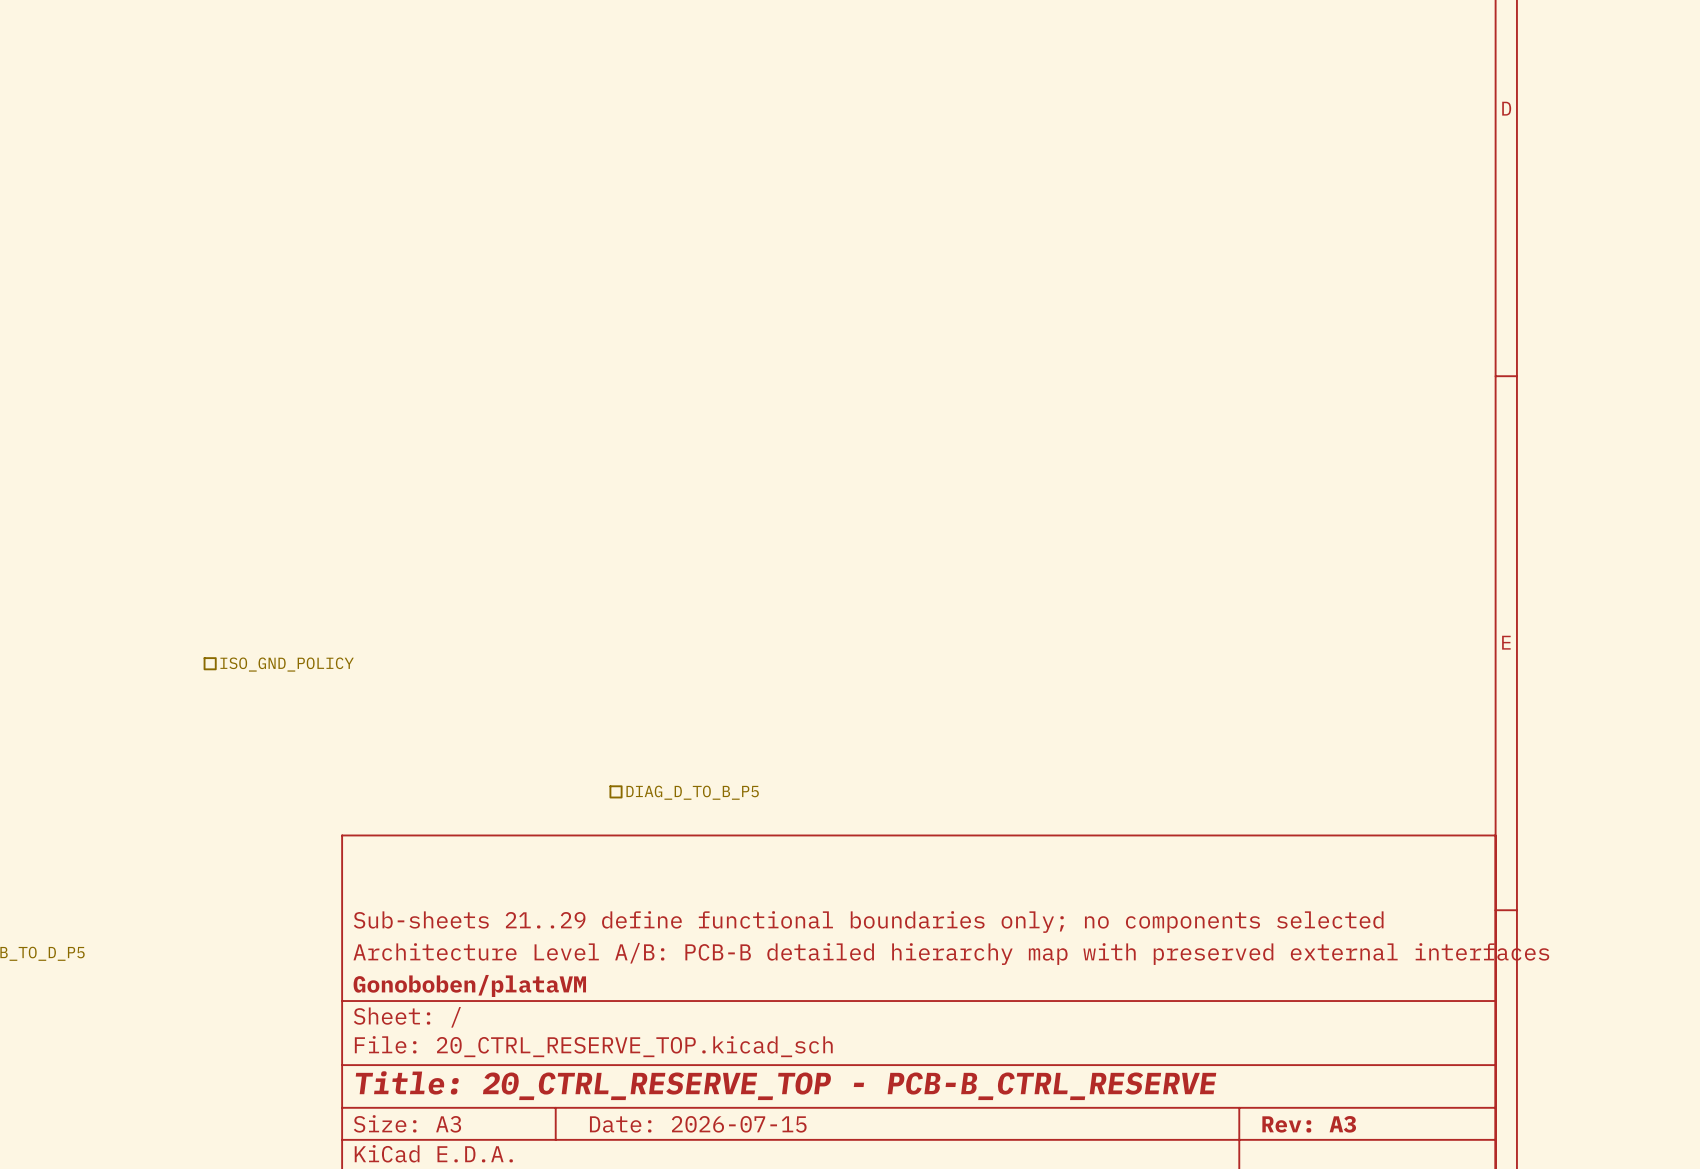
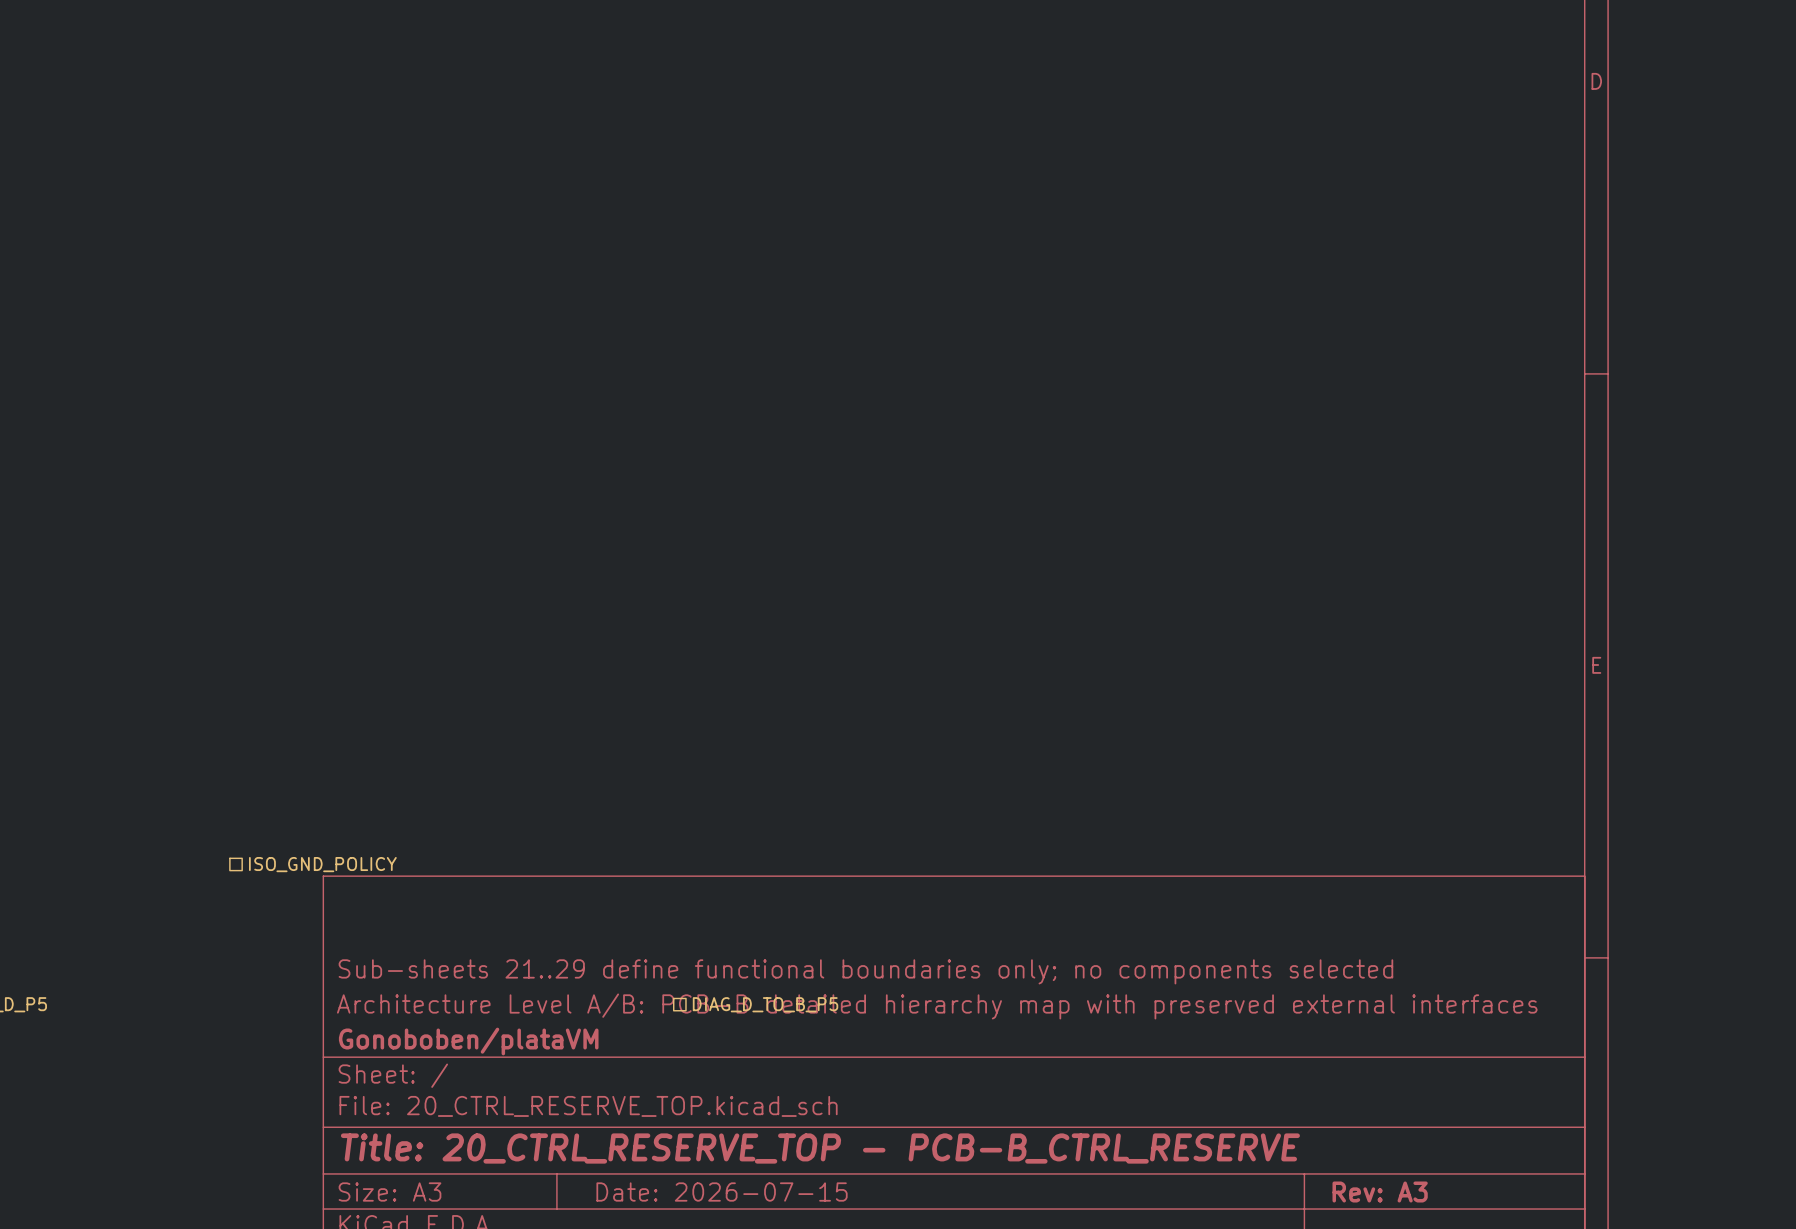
hierarchical label position: ISO_GND_POLICY (287, 664) -> ISO_GND_POLICY (322, 864)
hierarchical label position: DIAG_D_TO_B_P5 (692, 792) -> DIAG_D_TO_B_P5 (765, 1004)

